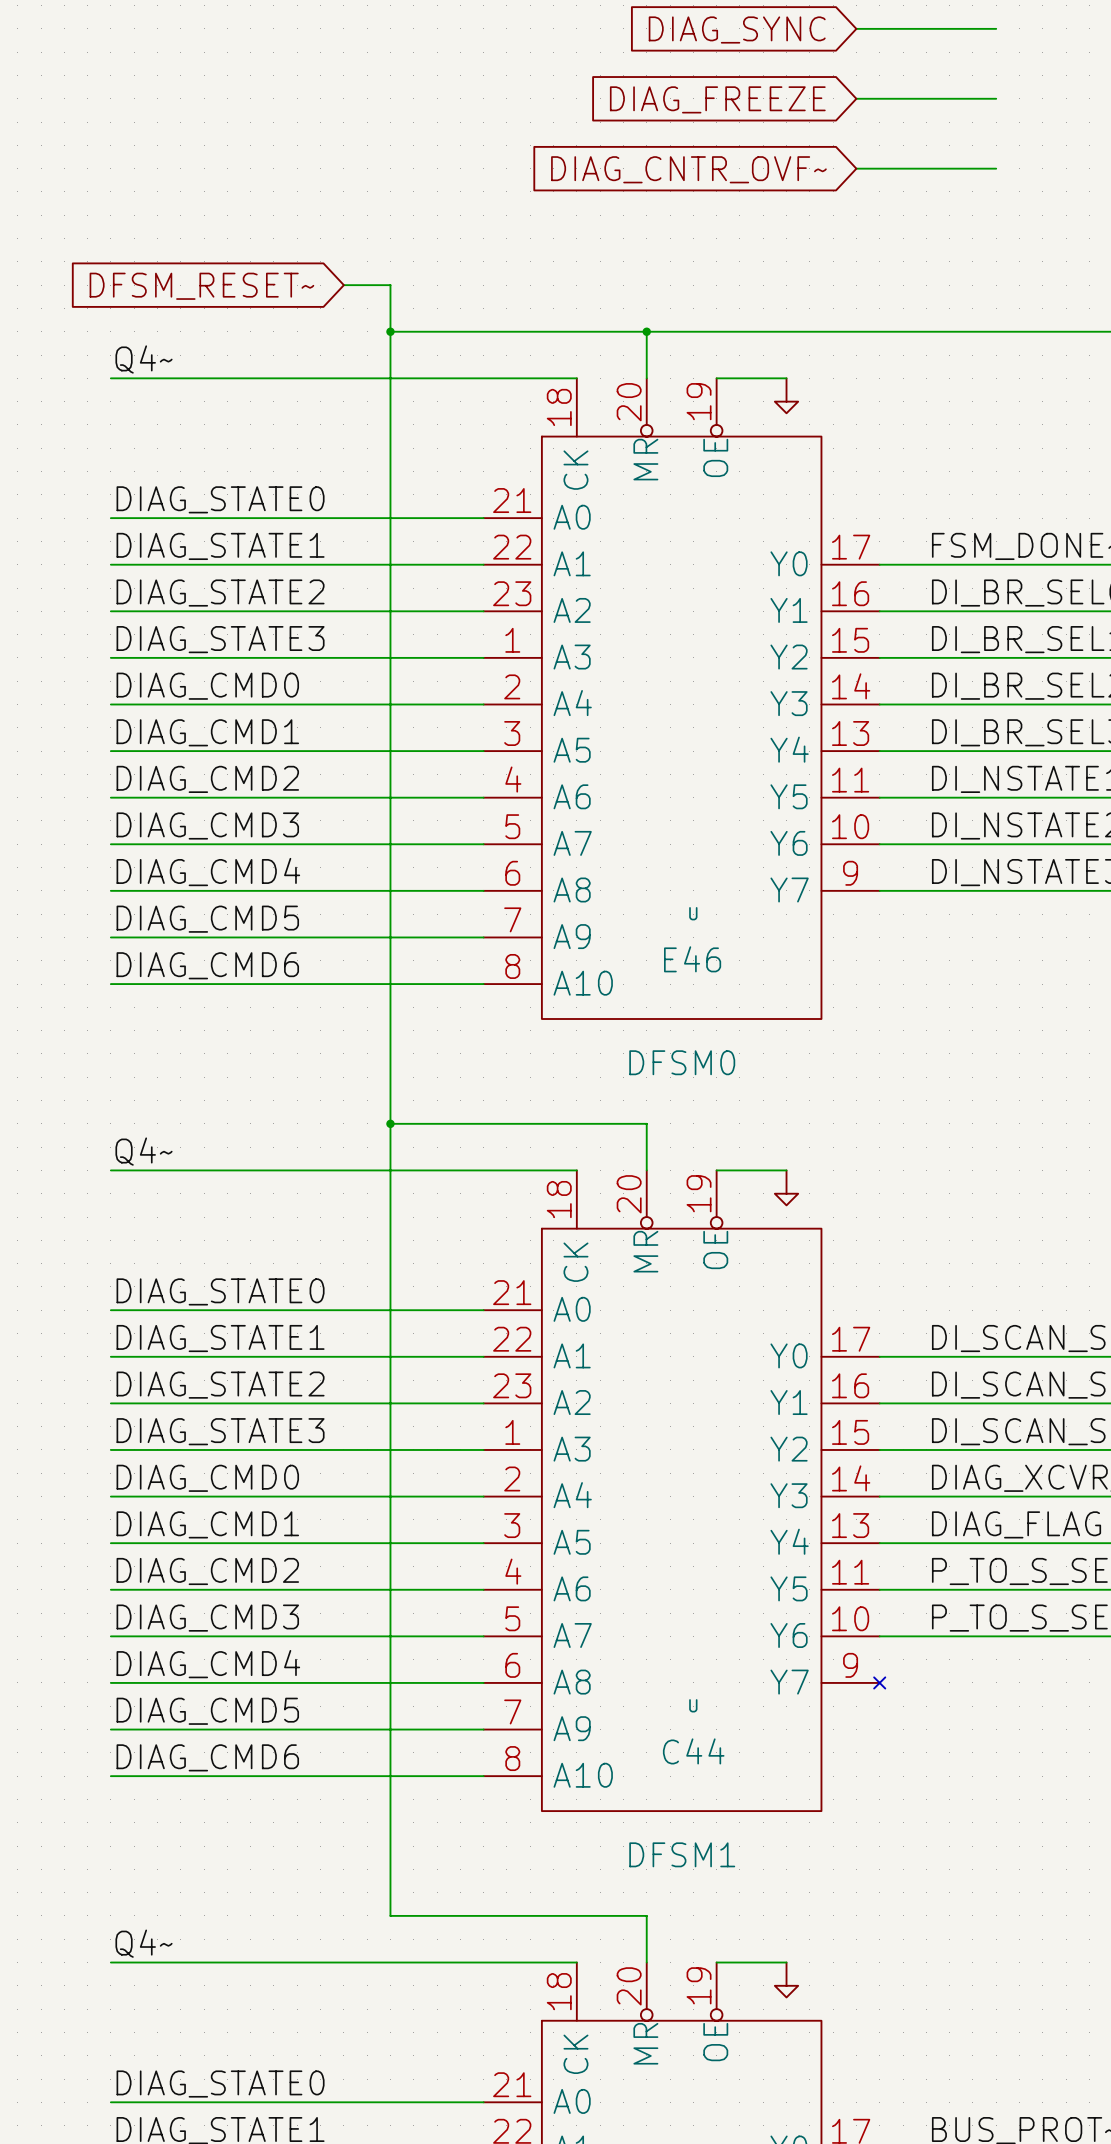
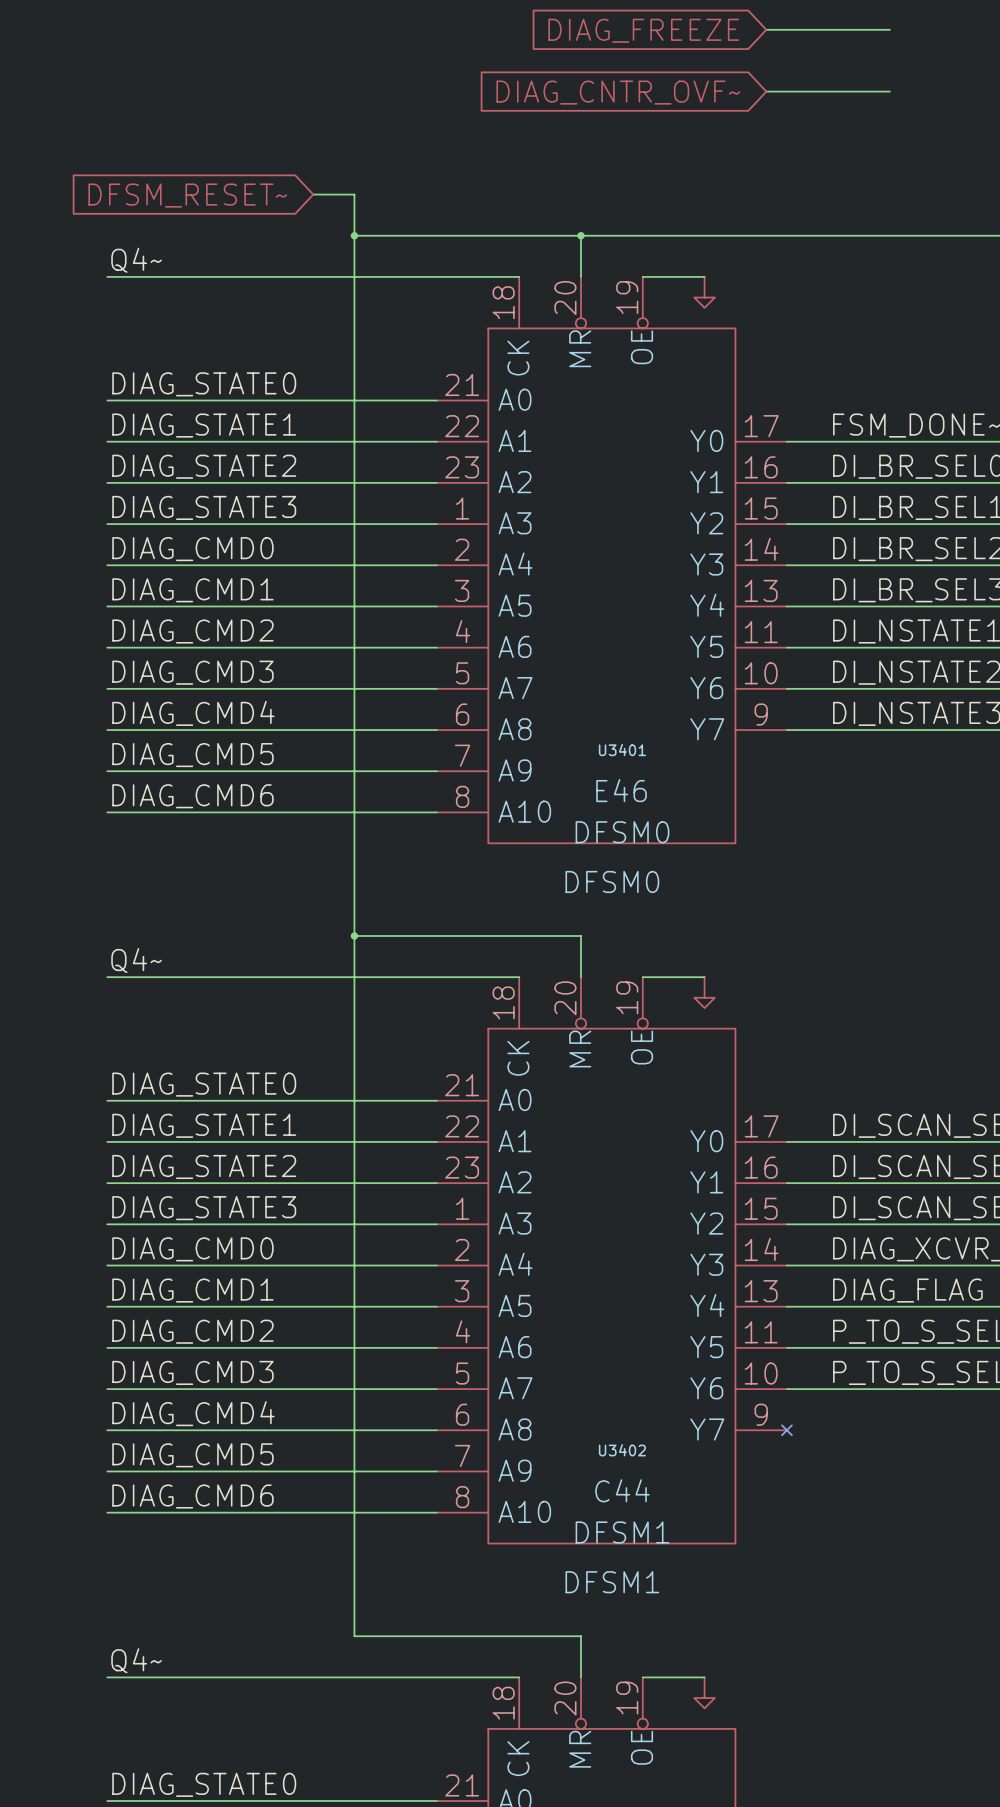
U name: U (693, 913) -> U3401 (622, 750)
U value: none -> DFSM0 (622, 832)
U name: U (693, 1705) -> U3402 (622, 1450)
U value: none -> DFSM1 (622, 1532)

